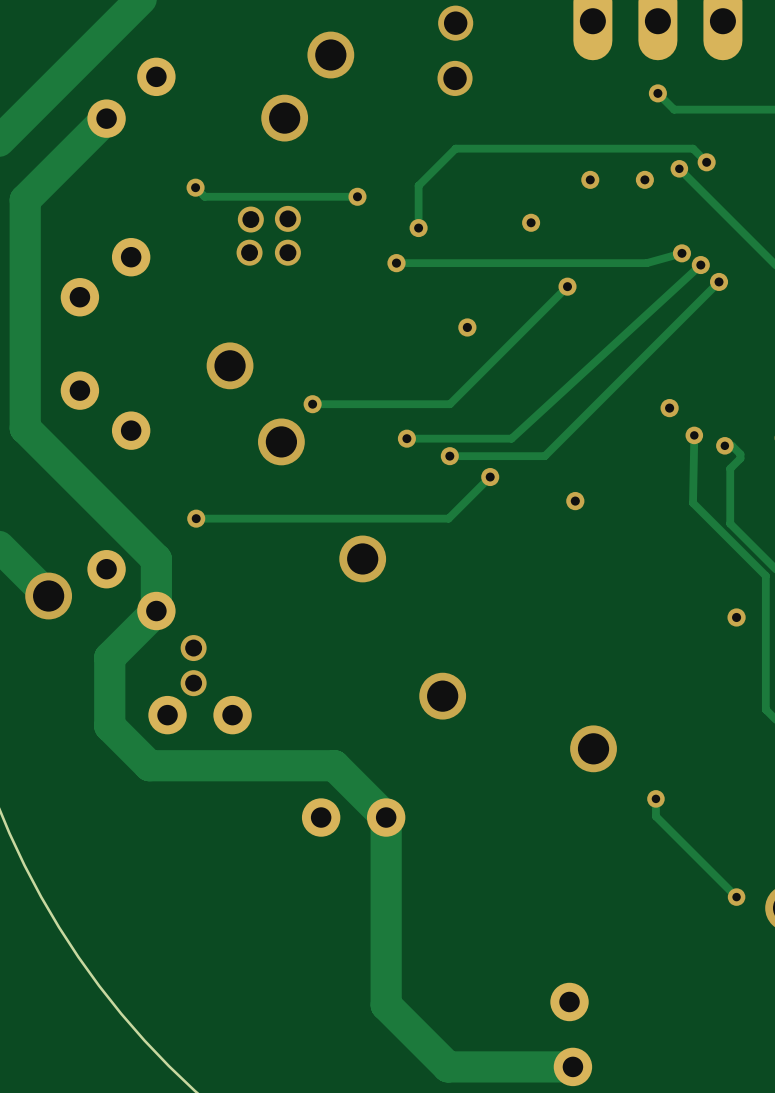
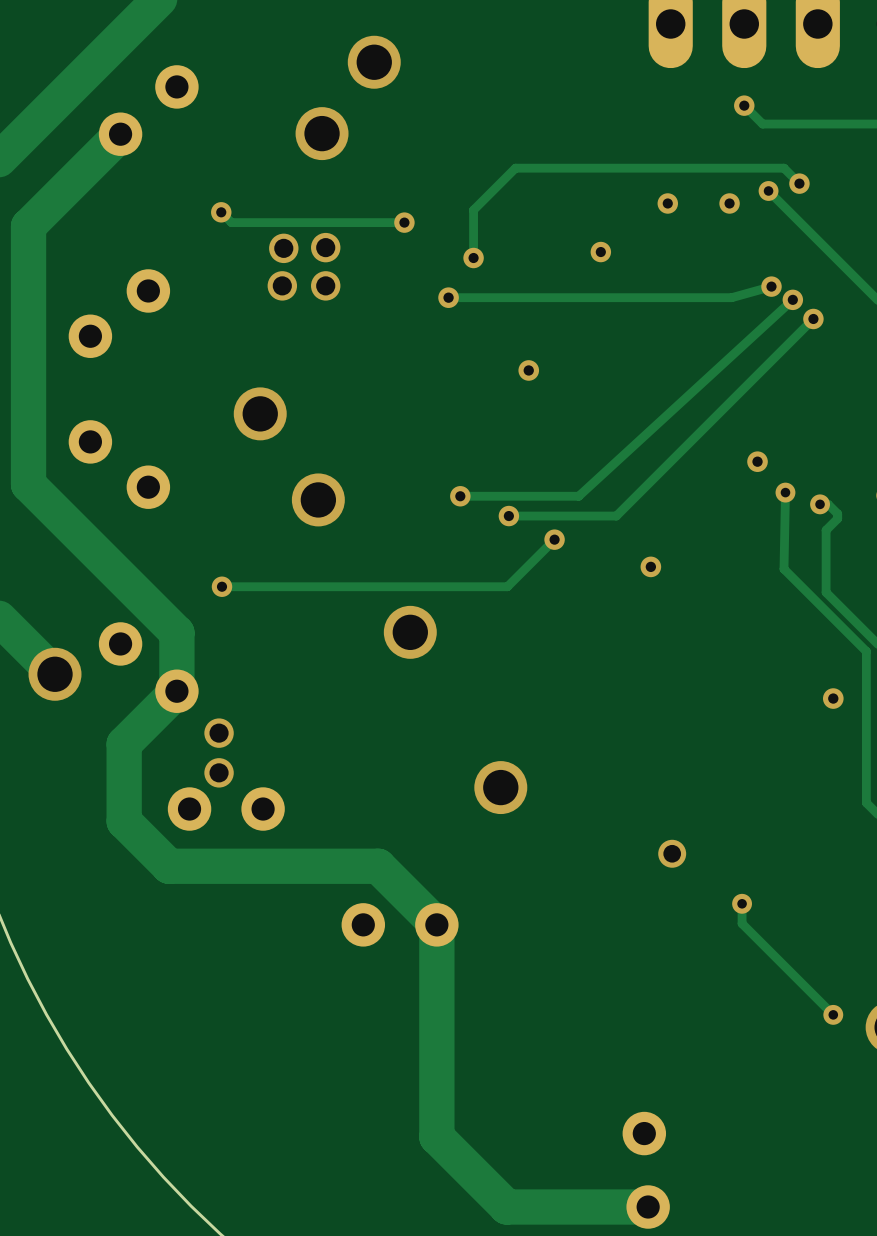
via: (455, 23) -> none
via: (455, 78) -> none
track: (567, 286) (449, 404) (312, 404) -> none
via: (567, 286) -> none
via: (312, 404) -> none
via size: [570, 725, 617, 773] -> [658, 839, 687, 868]

